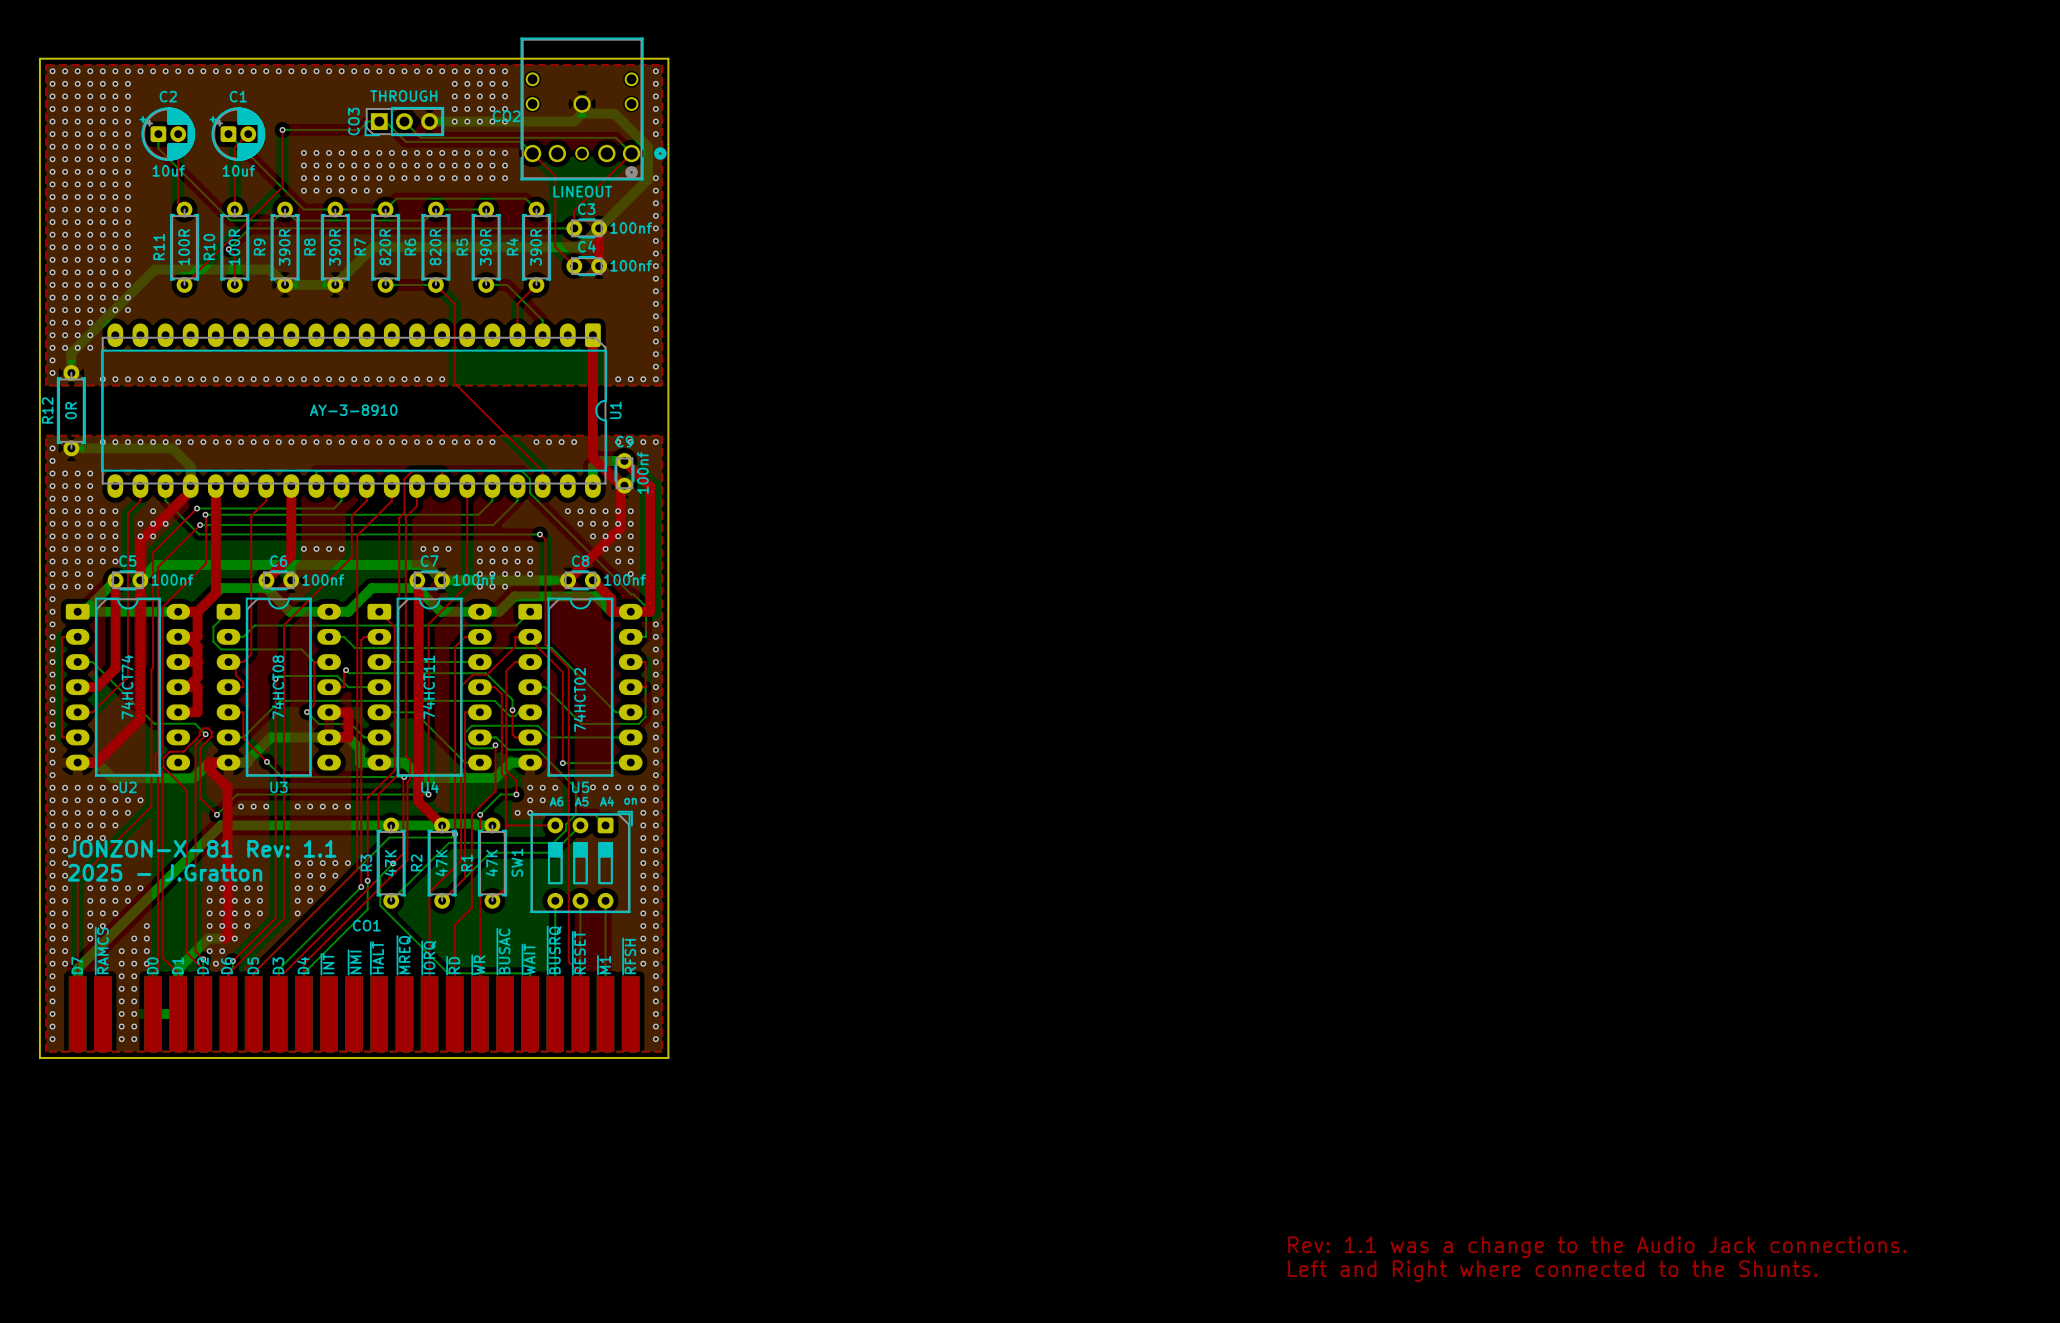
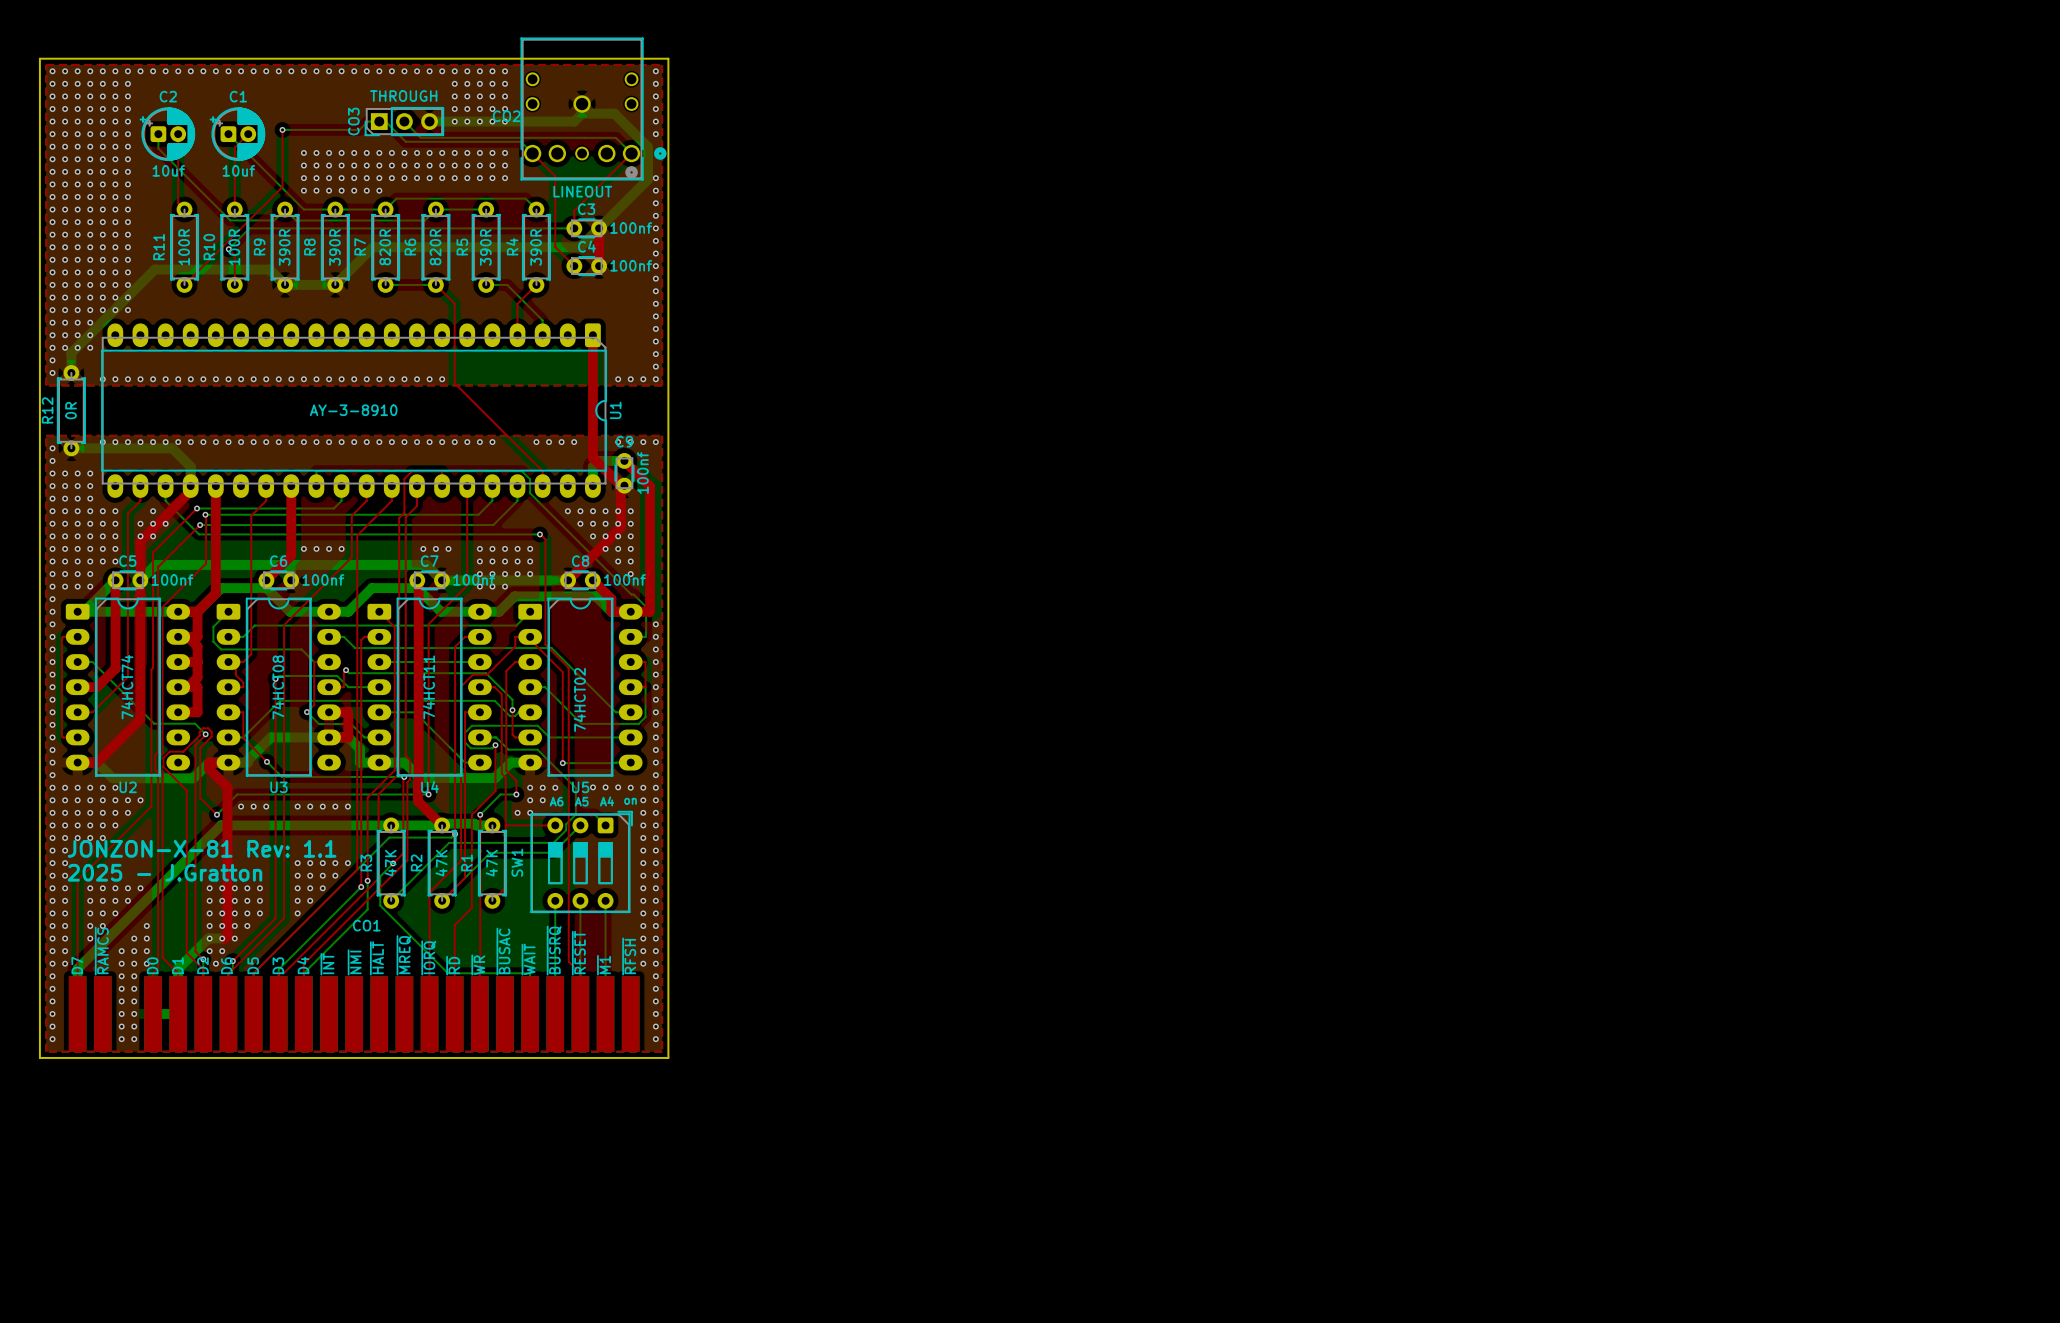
text: Rev: 1.1 was a change to the Audio Jack connections. (1597, 1247) -> none
text: Left and Right where connected to the Shunts. (1552, 1271) -> none

